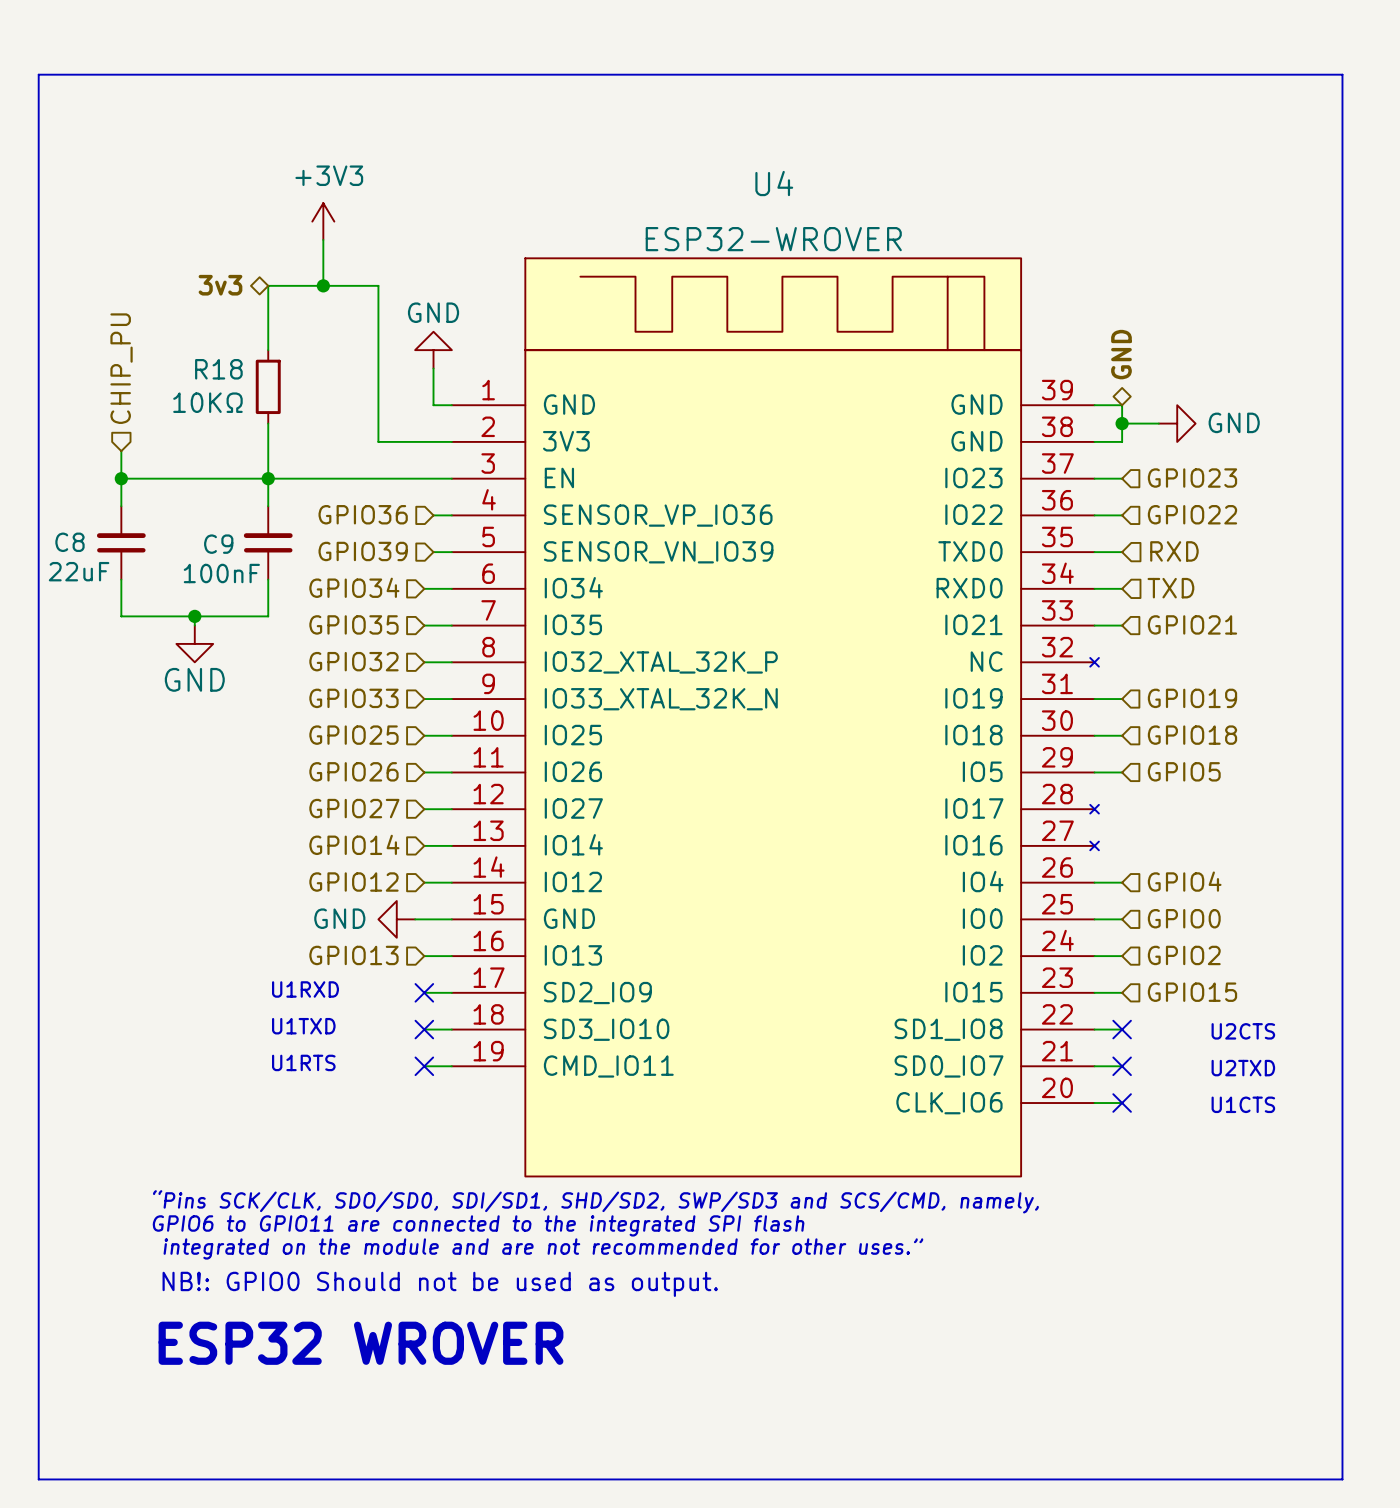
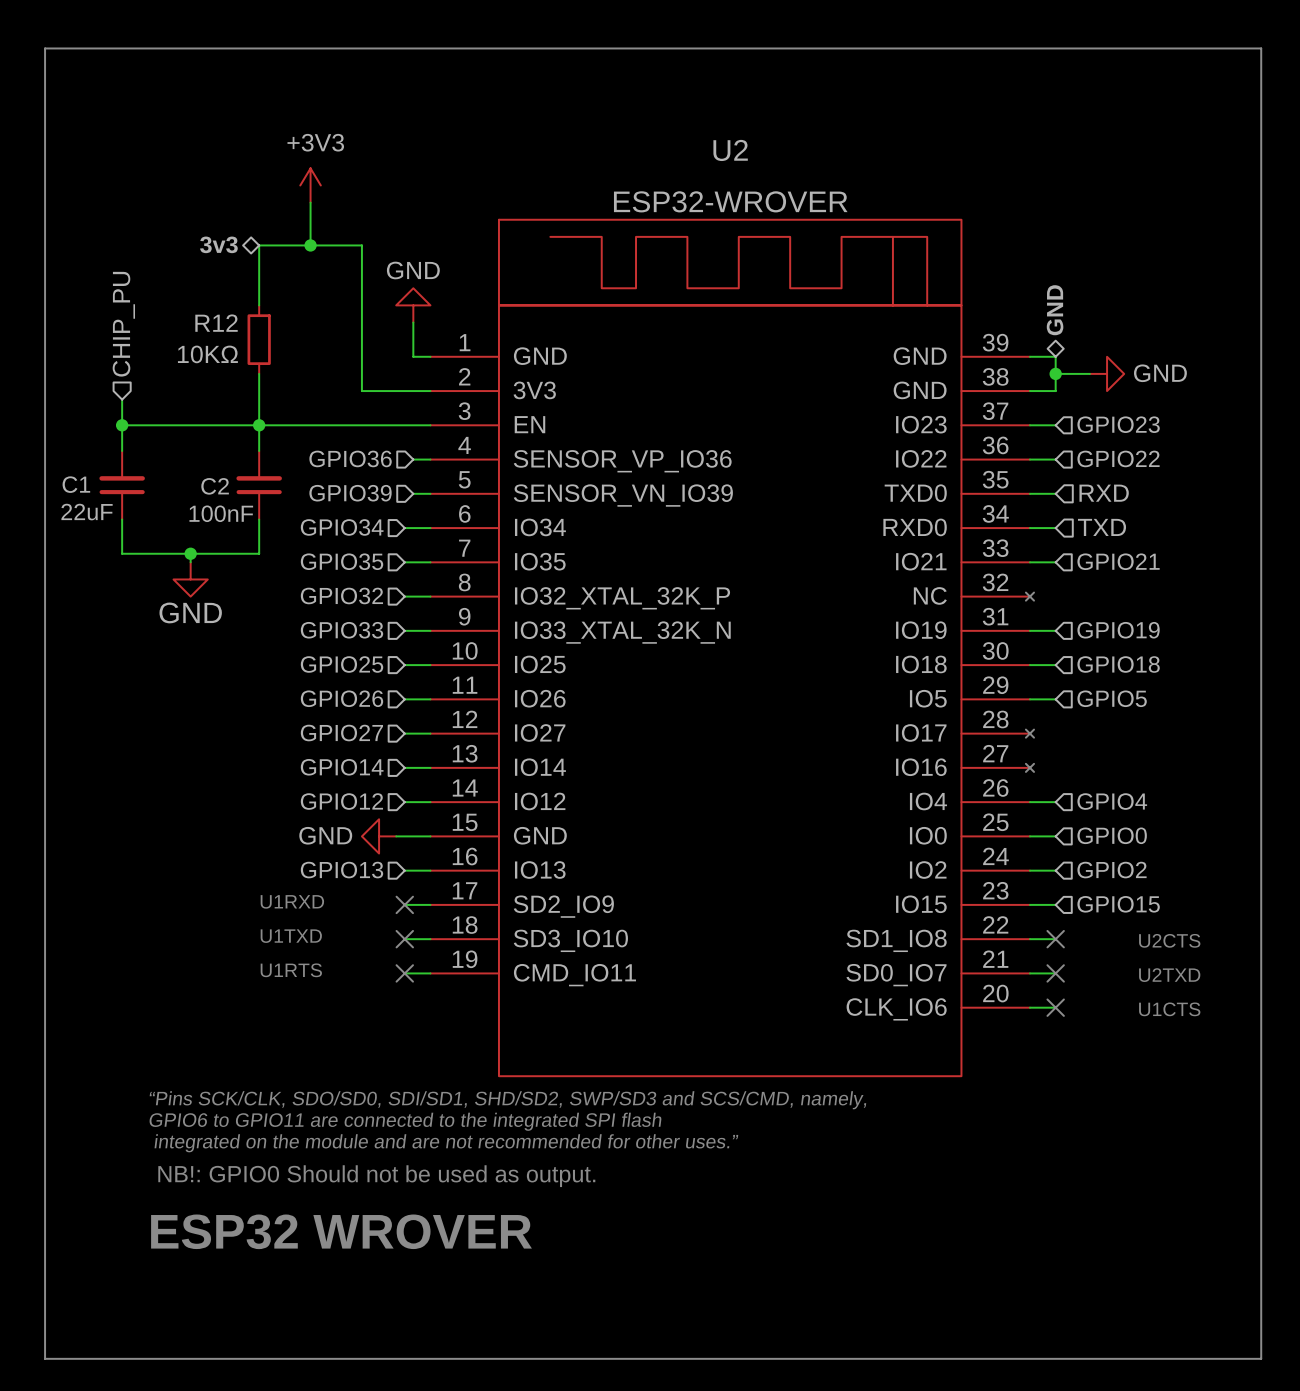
U4 name: U4 (774, 183) -> U2 (730, 150)
R18 name: R18 (218, 369) -> R12 (216, 323)
C8 name: C8 (69, 542) -> C1 (76, 484)
C9 name: C9 (218, 544) -> C2 (215, 486)

